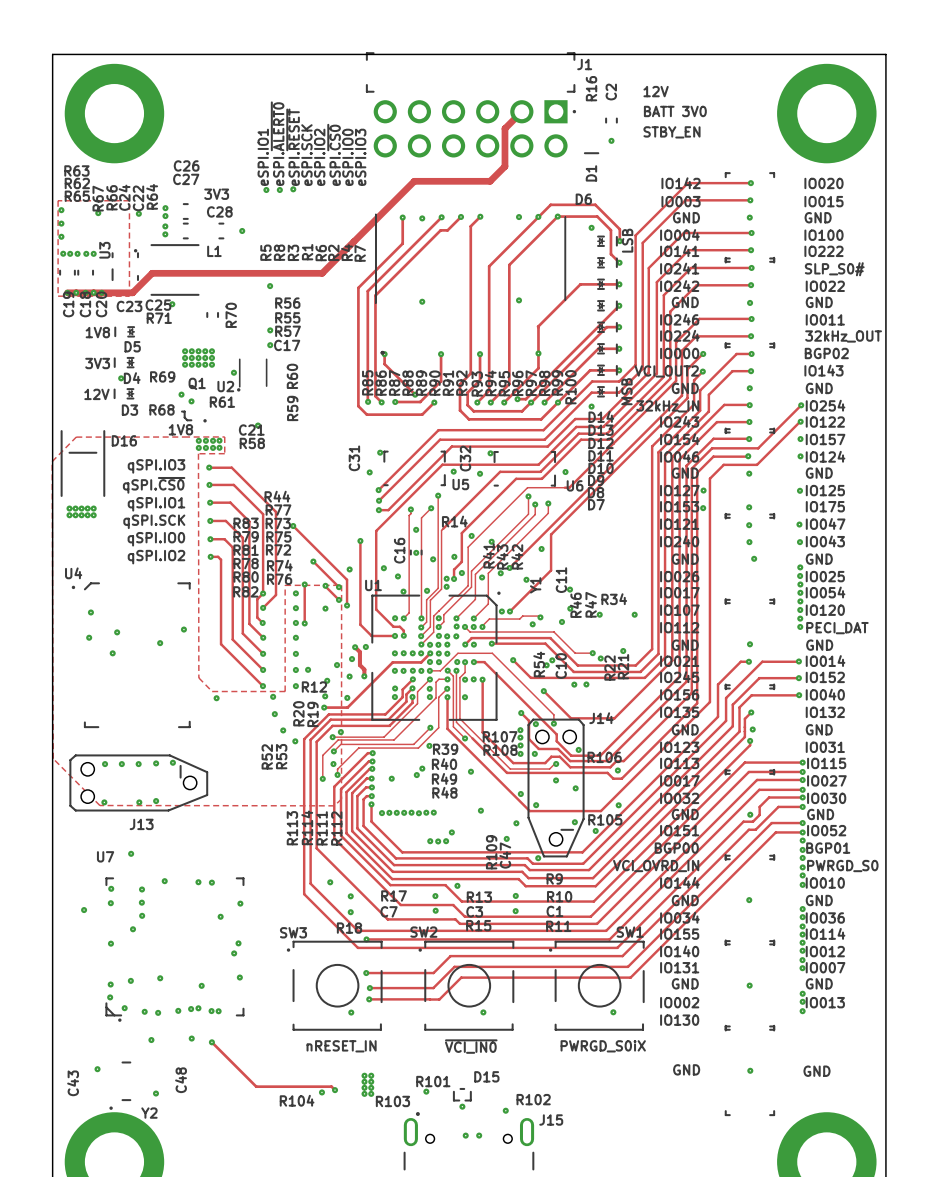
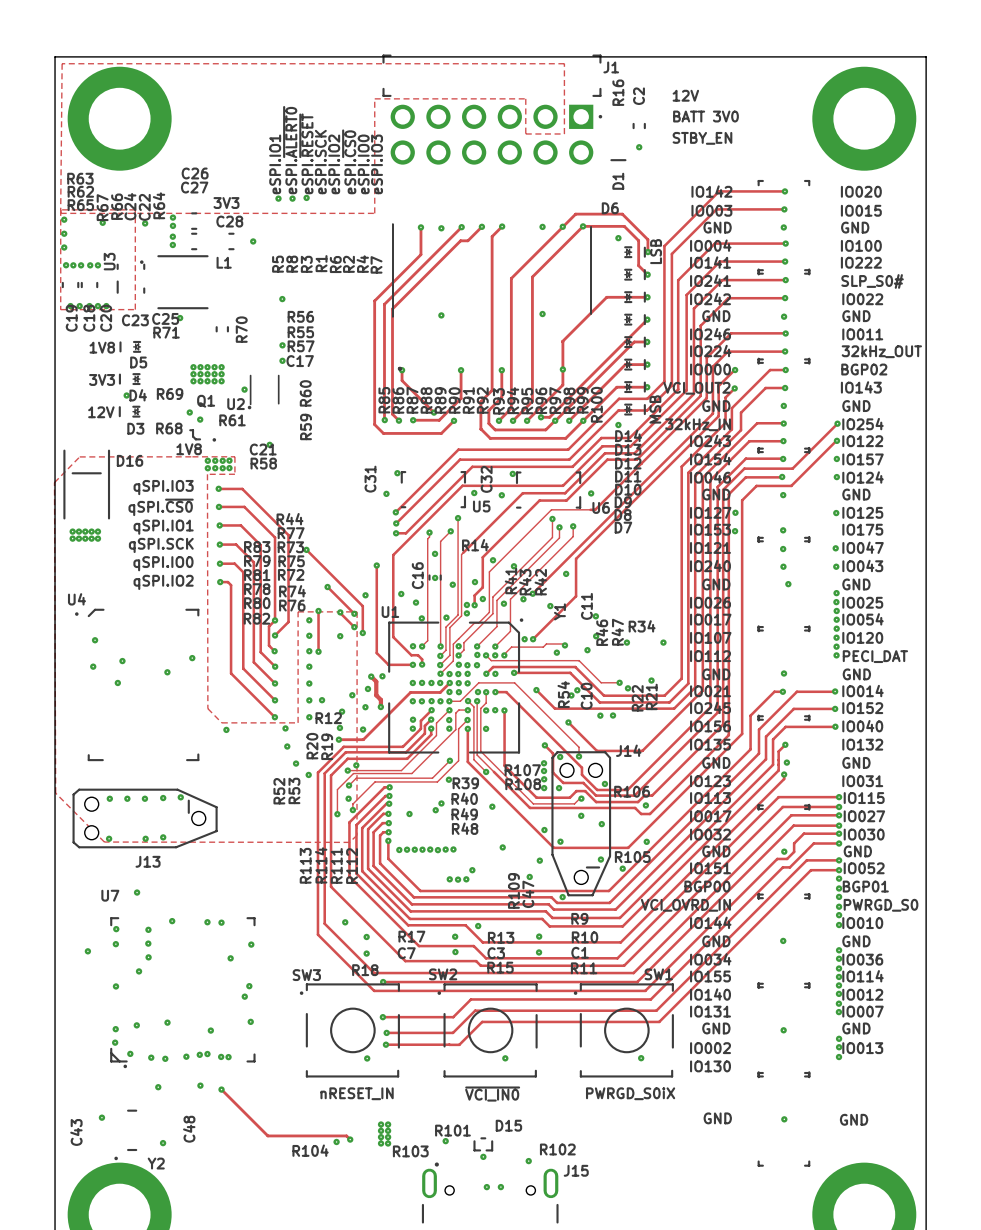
zone outline: none -> (62, 63) (564, 63) (564, 133) (525, 133) (525, 98) (374, 98) (374, 213) (60, 213) (62, 63)
track: (521, 111) (504, 128) (504, 166) (490, 181) (414, 181) (353, 241) -> none
track: (353, 241) (322, 273) (152, 273) (132, 292) (67, 292) -> none

